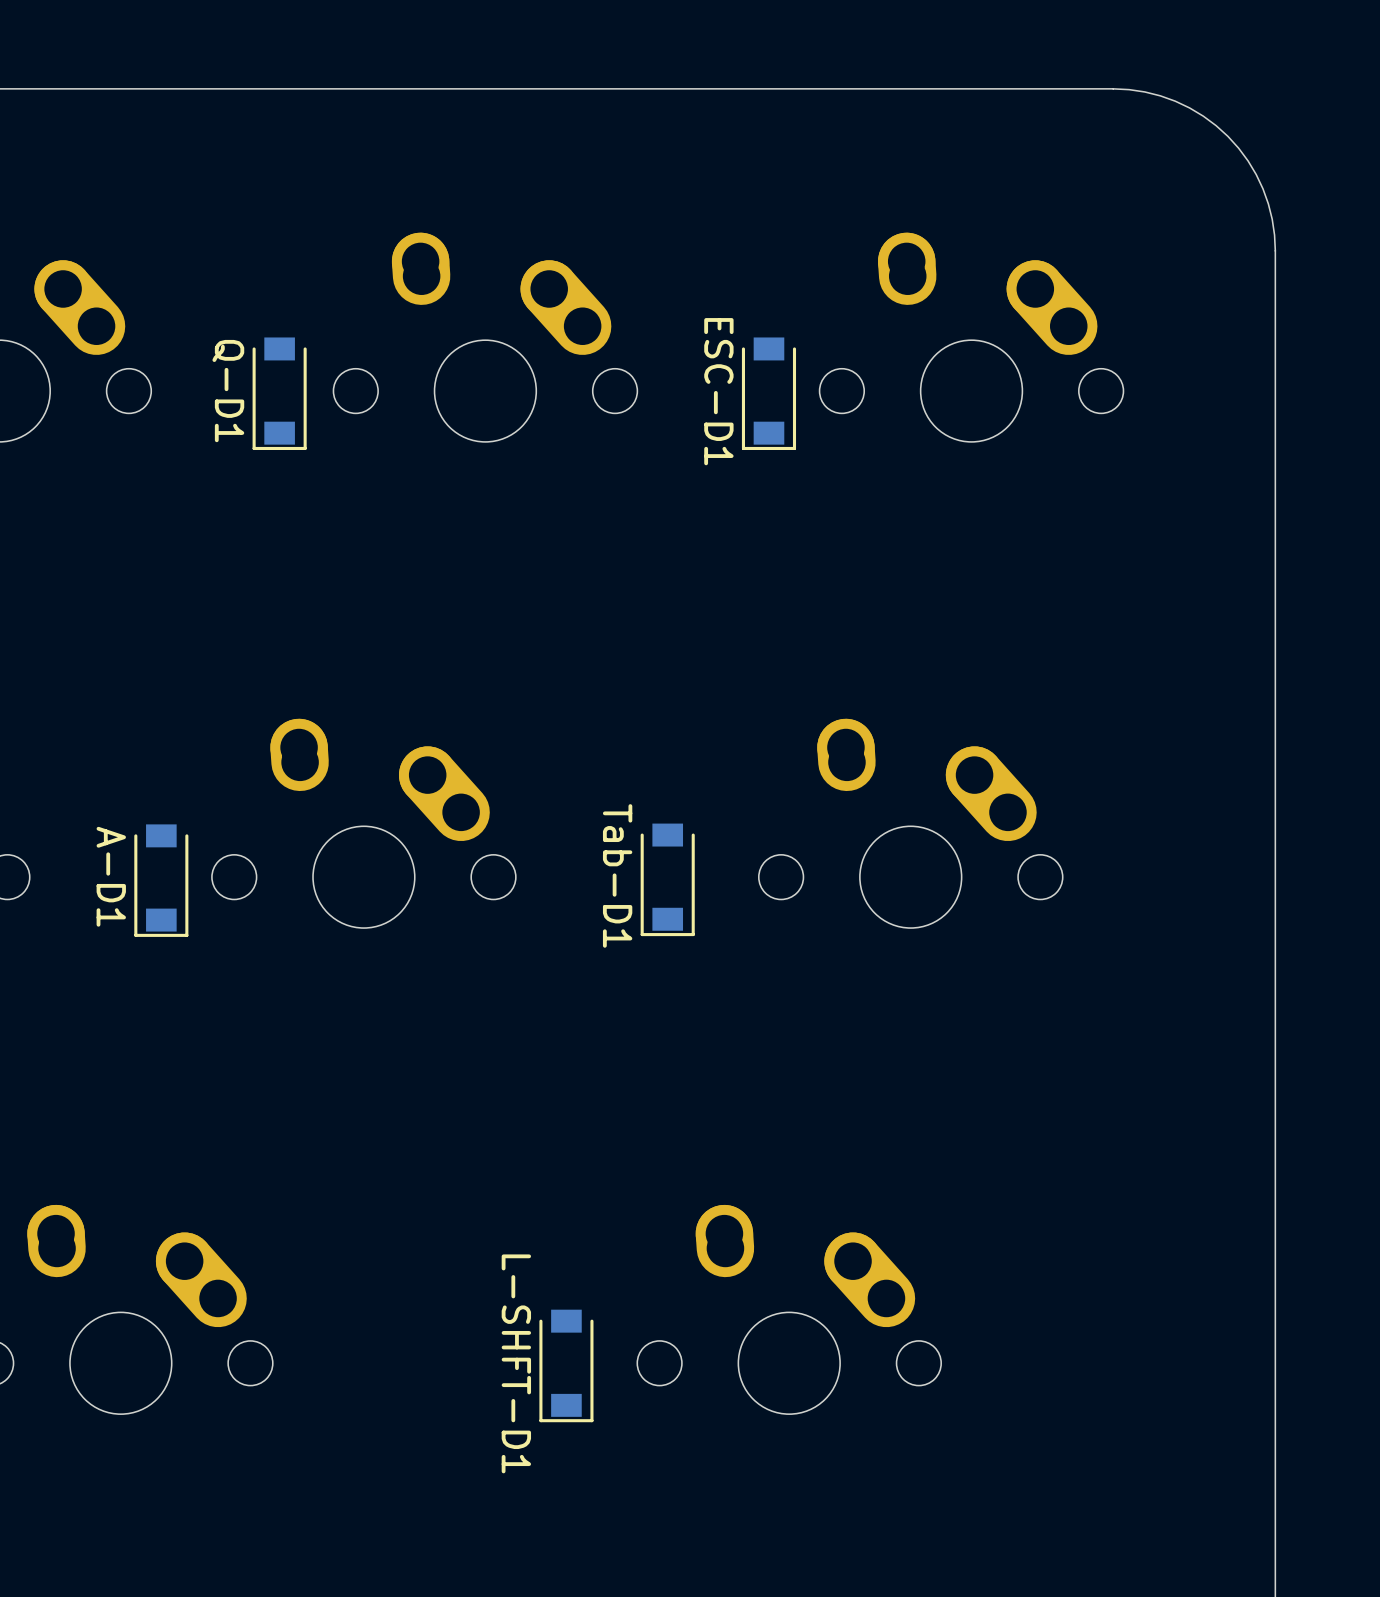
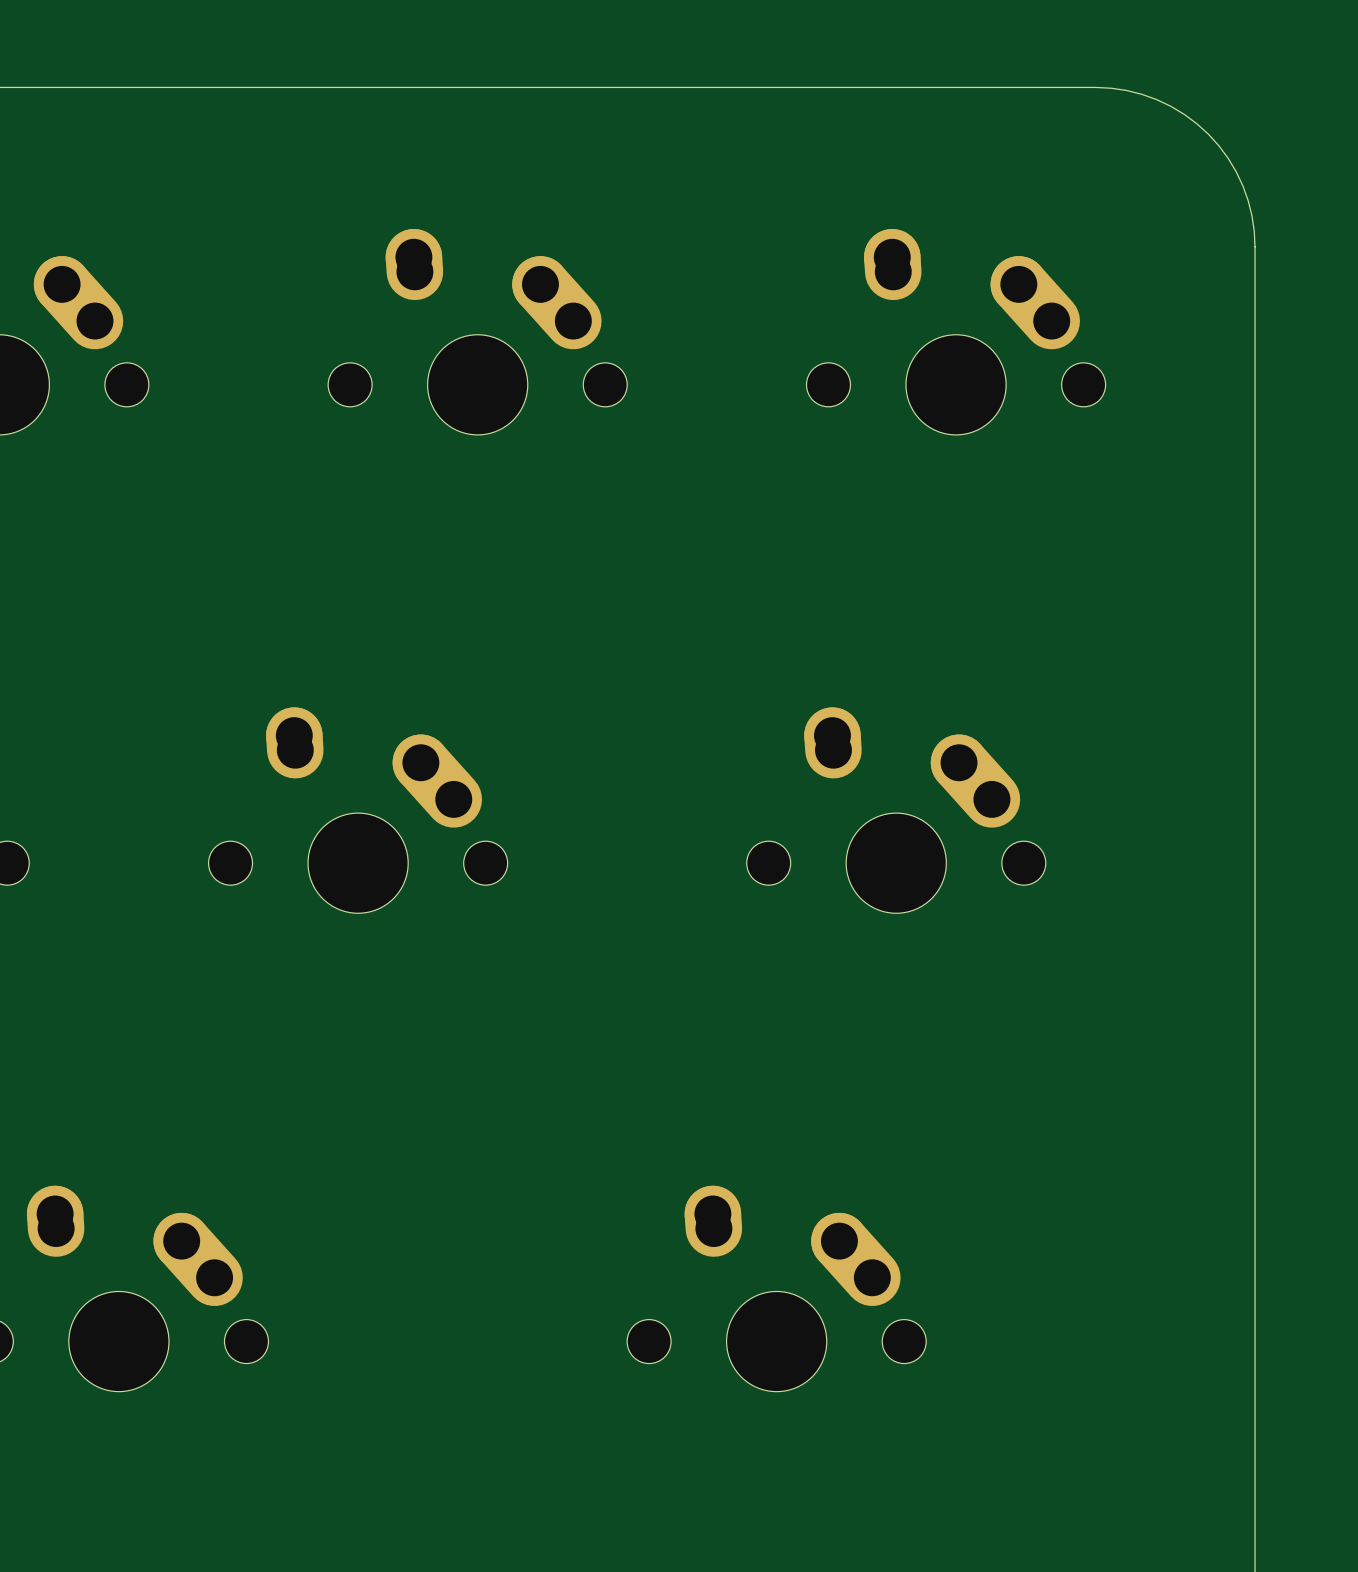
Q-D1: (279, 393) -> none
ESC-D1: (768, 393) -> none
Tab-D1: (667, 879) -> none
A-D1: (161, 880) -> none
L-SHFT-D1: (566, 1365) -> none

